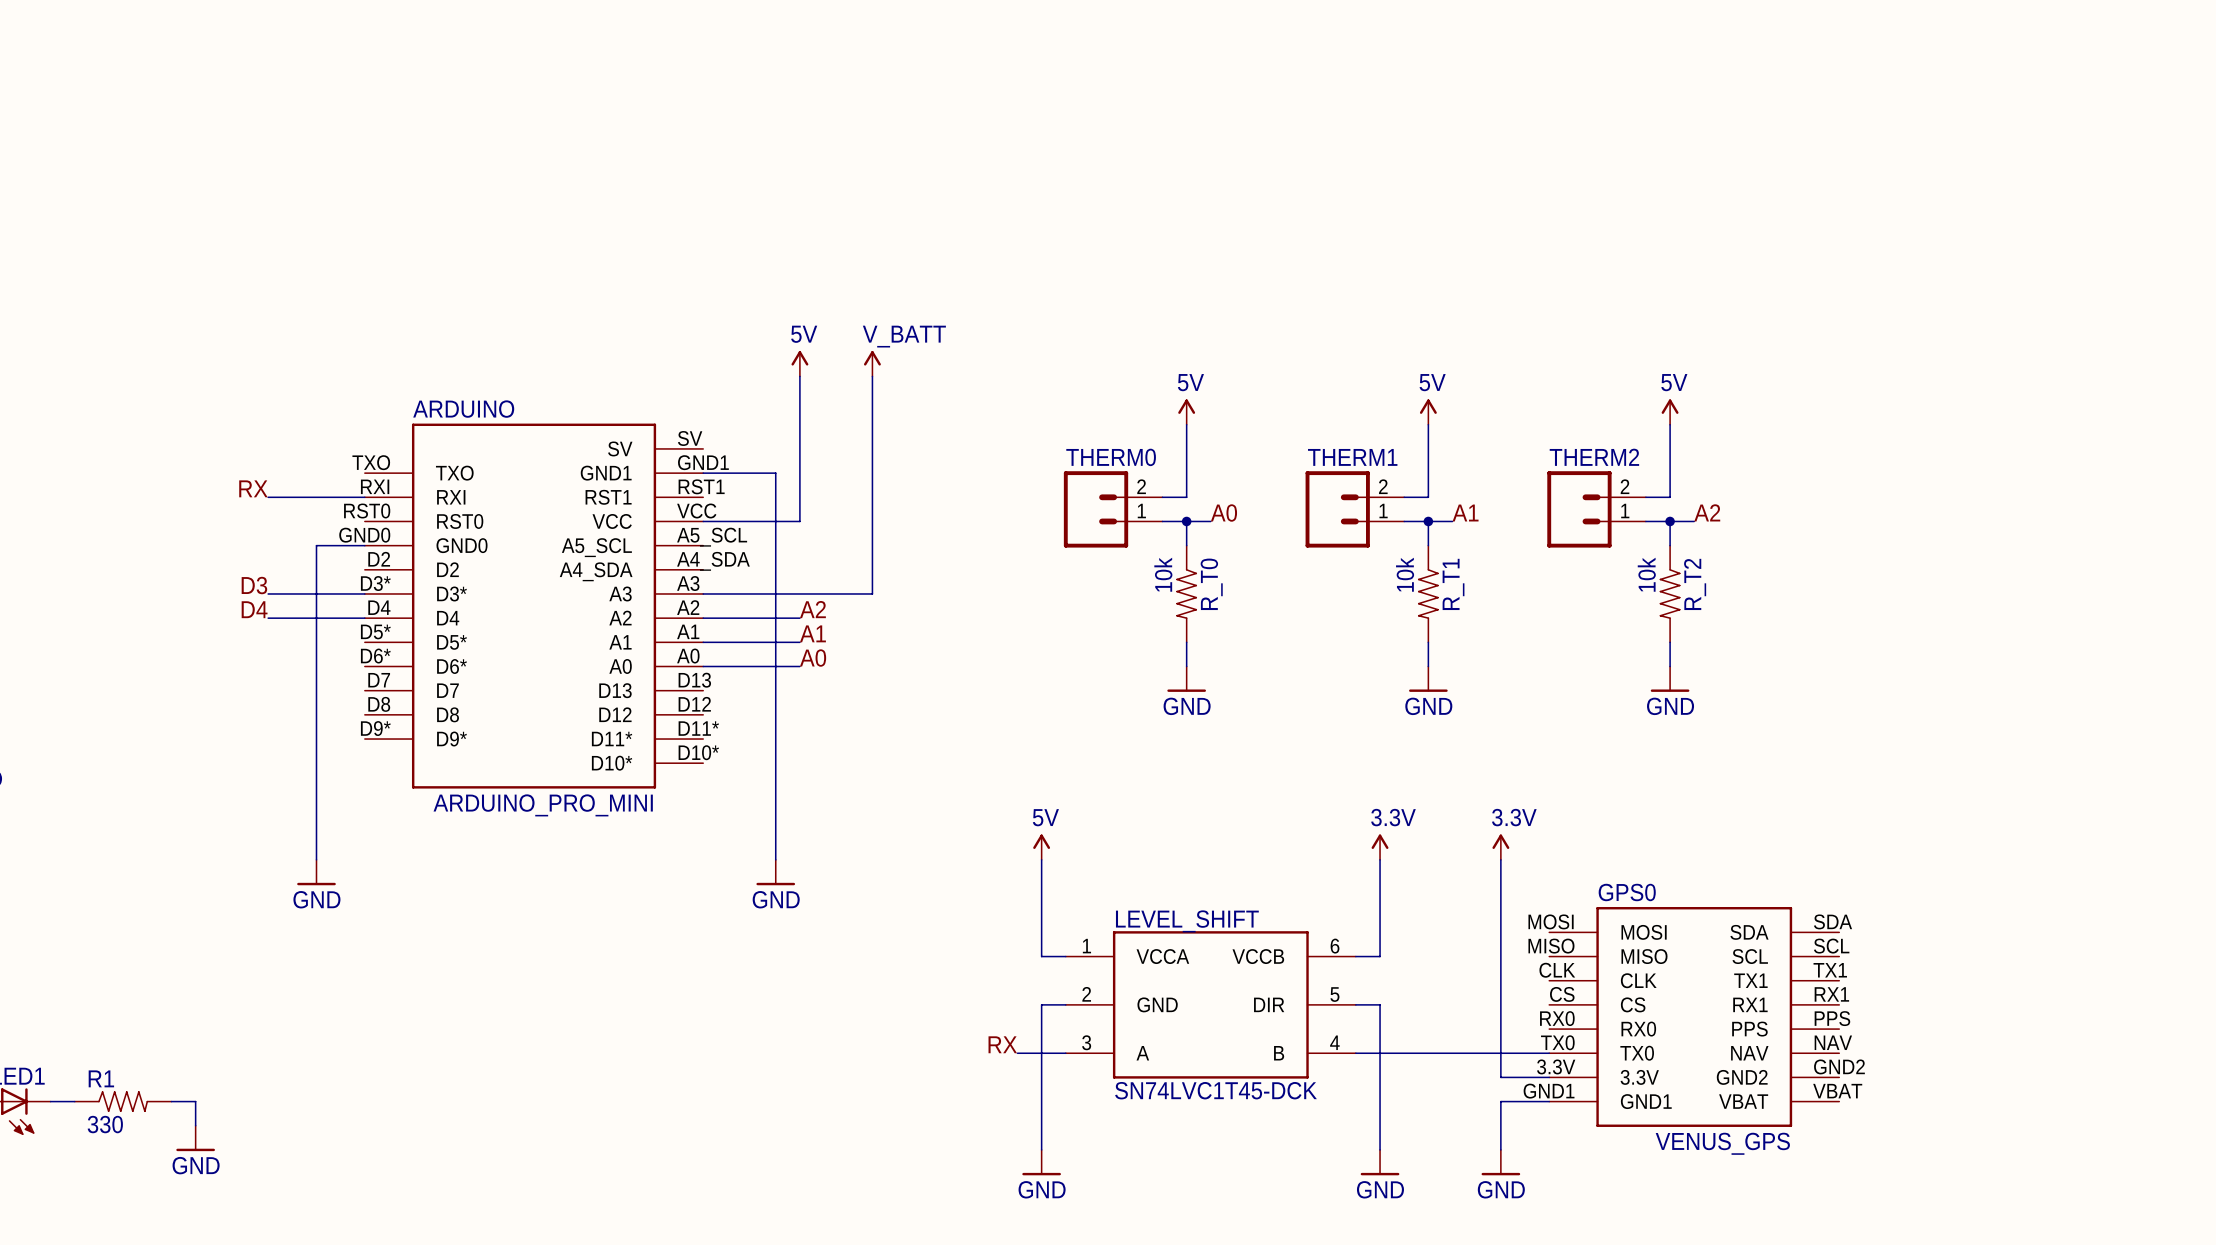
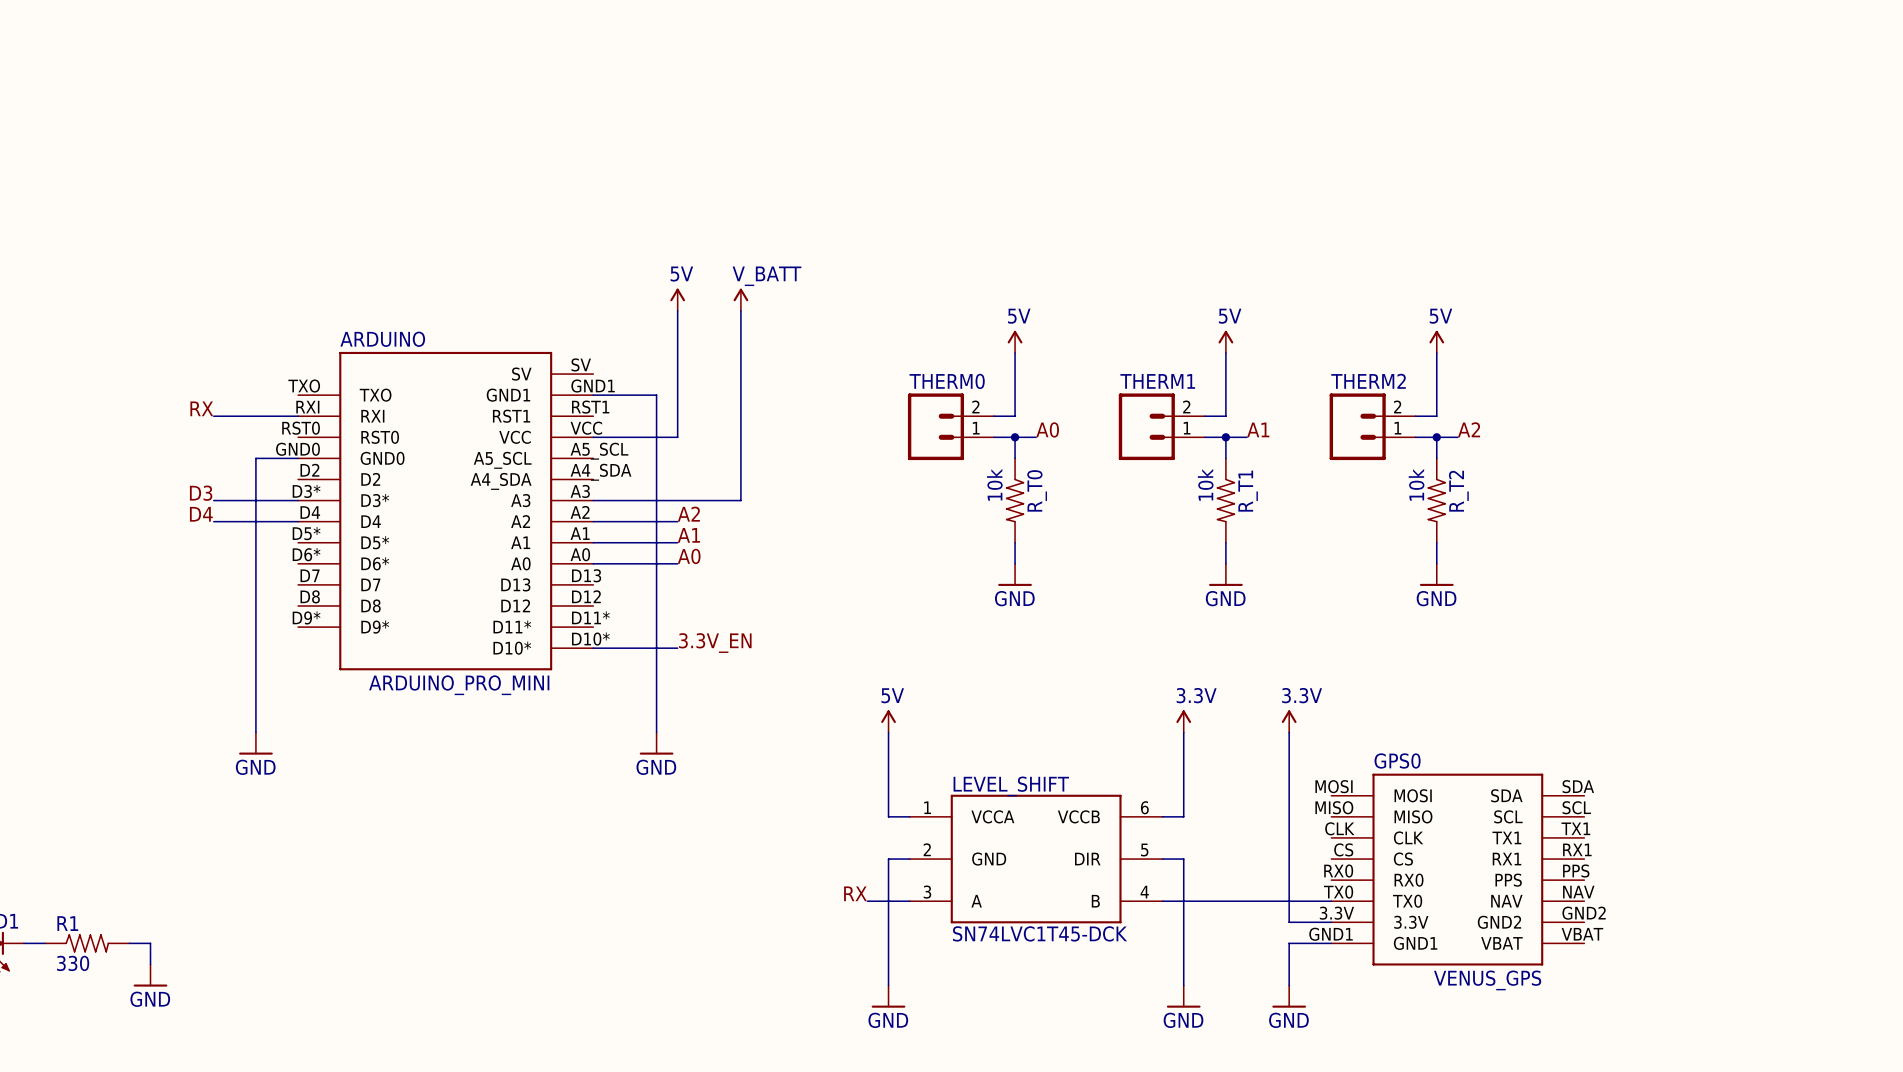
label: none -> 3.3V_EN (715, 643)
wire: none -> (593, 648) (677, 648)

